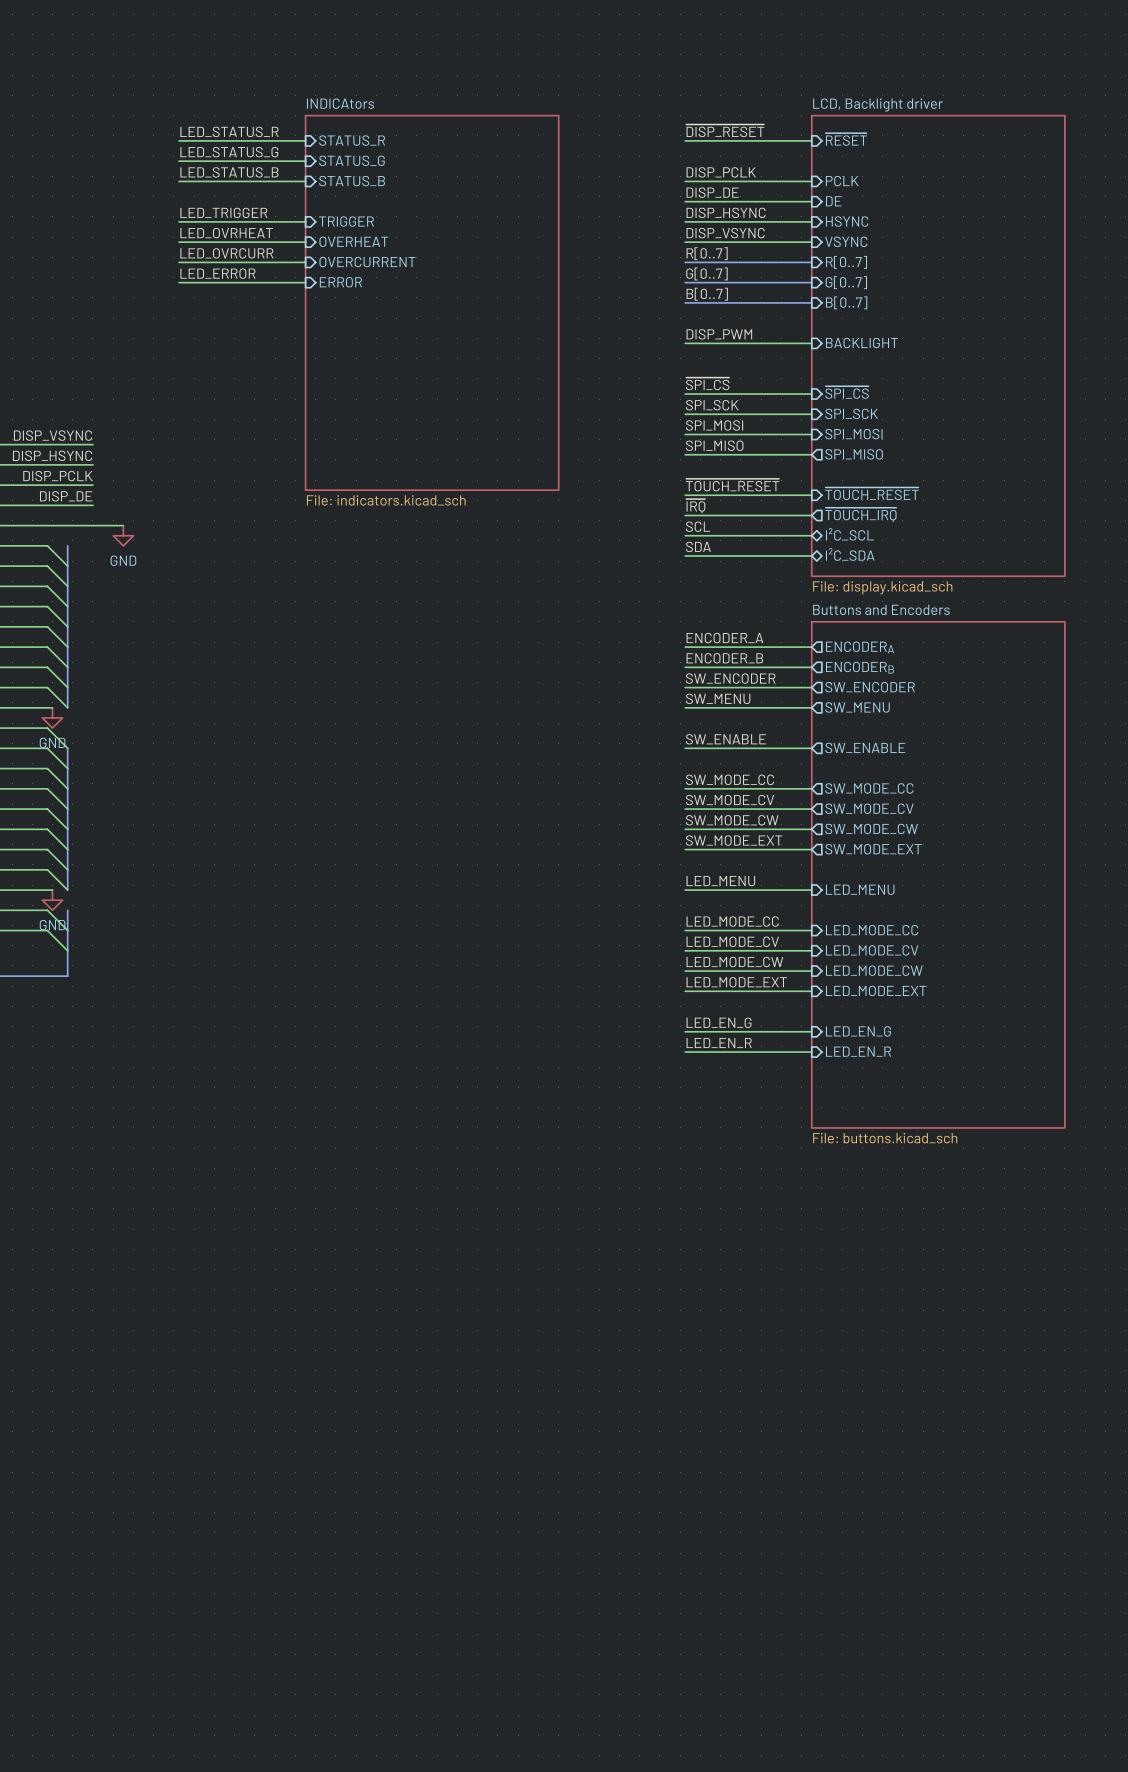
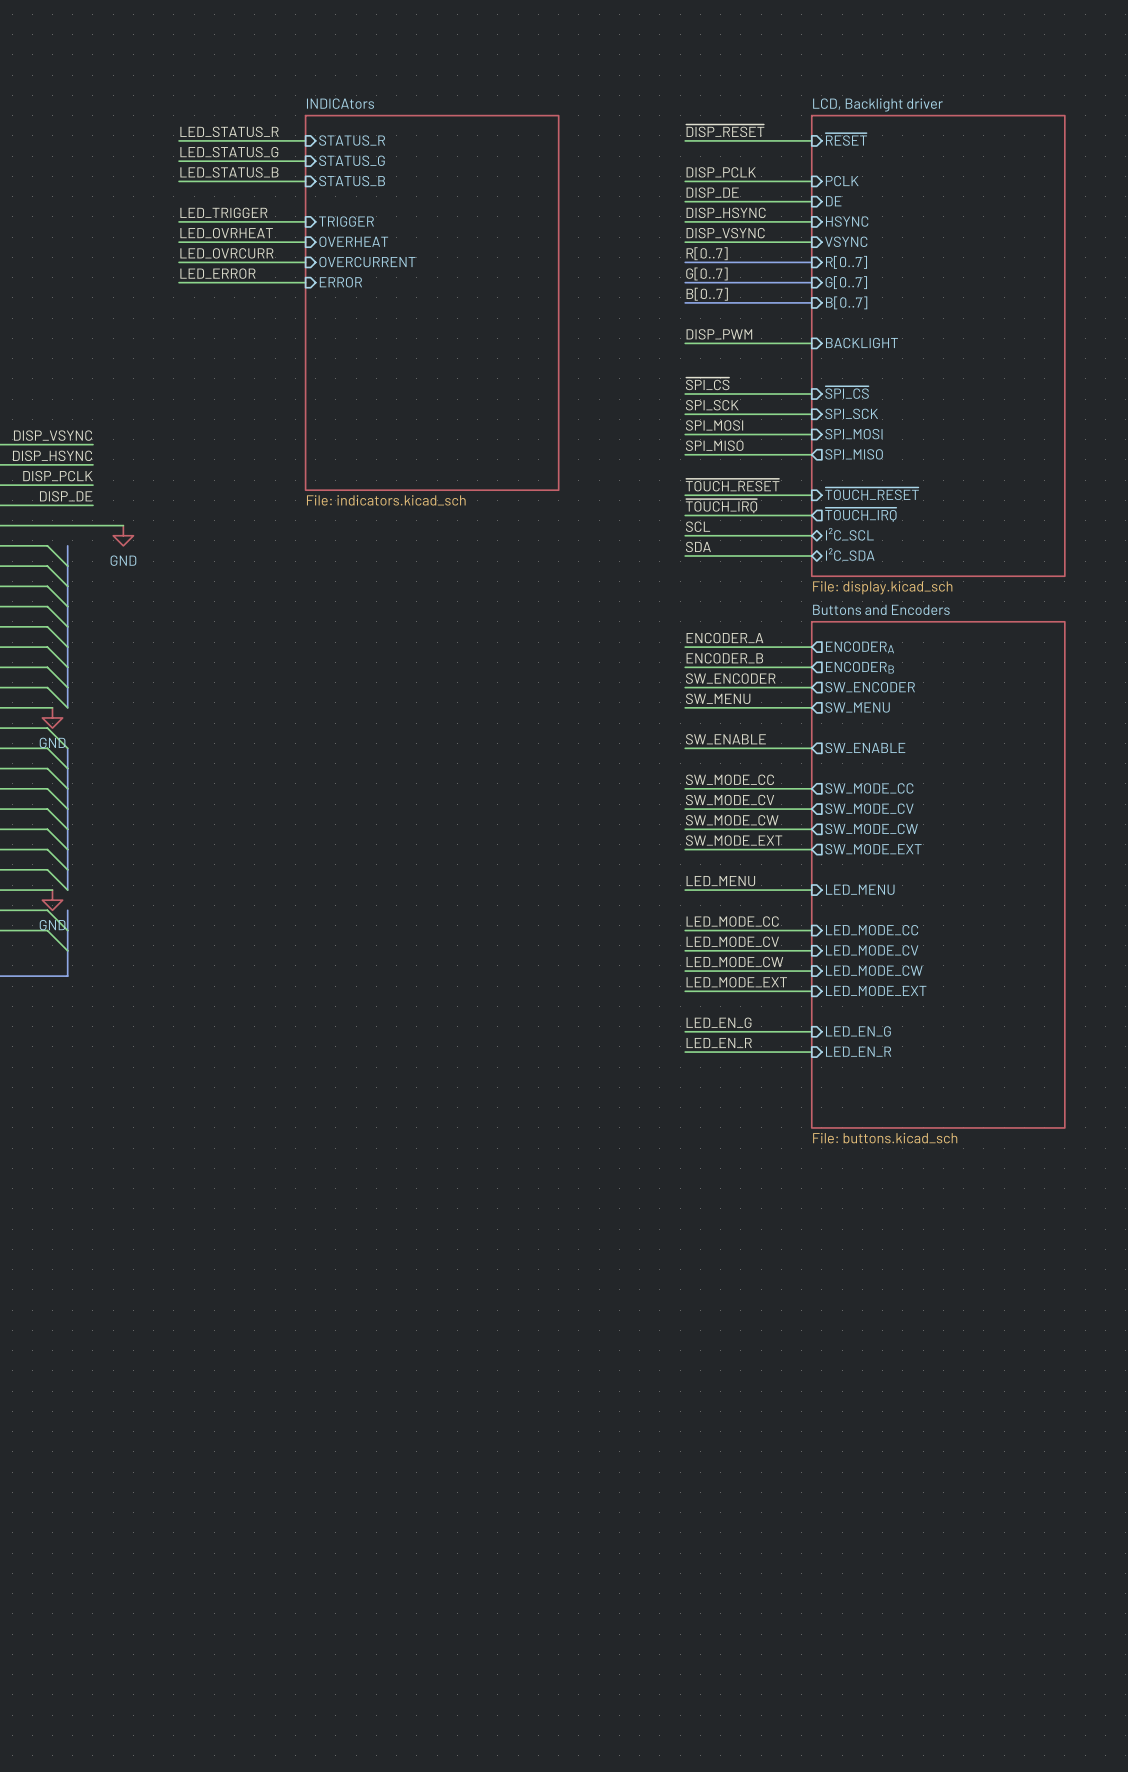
label: ~{IRQ} (695, 506) -> ~{TOUCH_IRQ} (721, 506)

